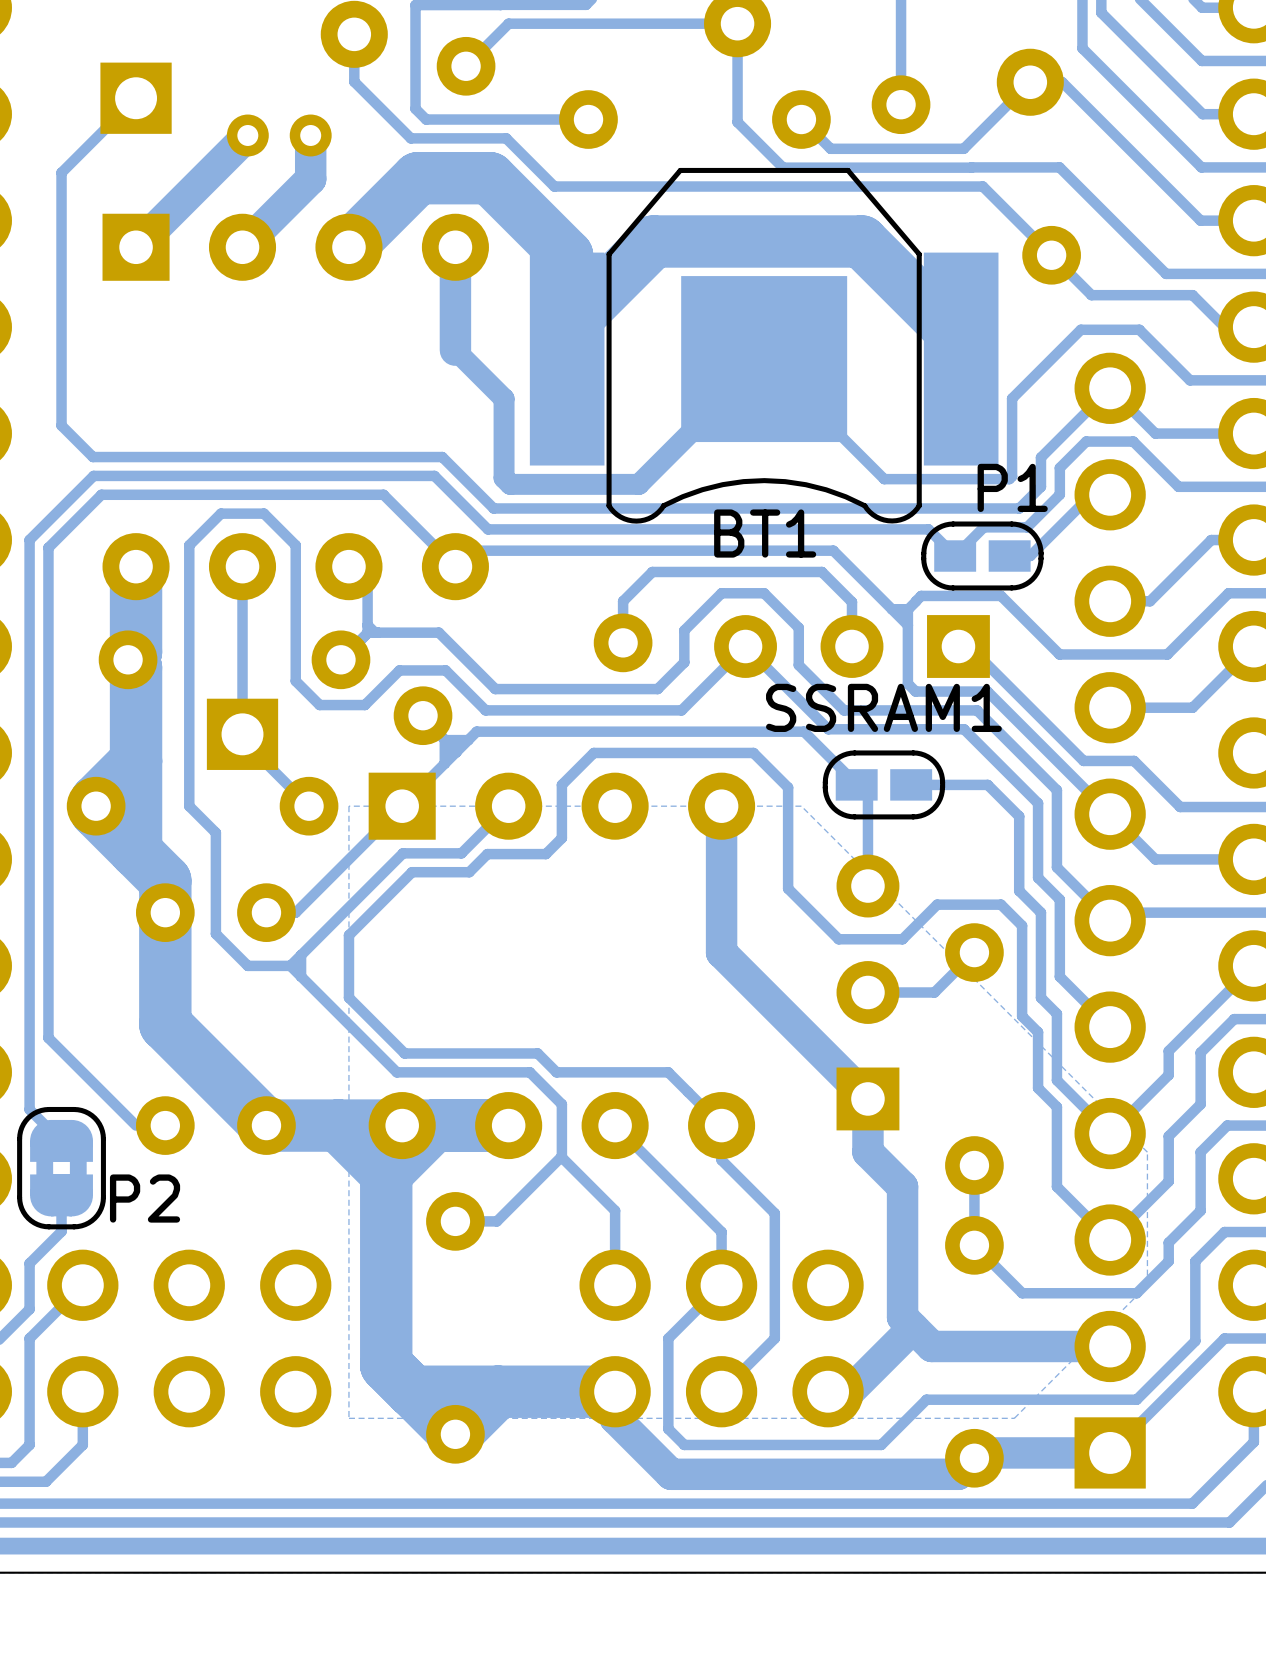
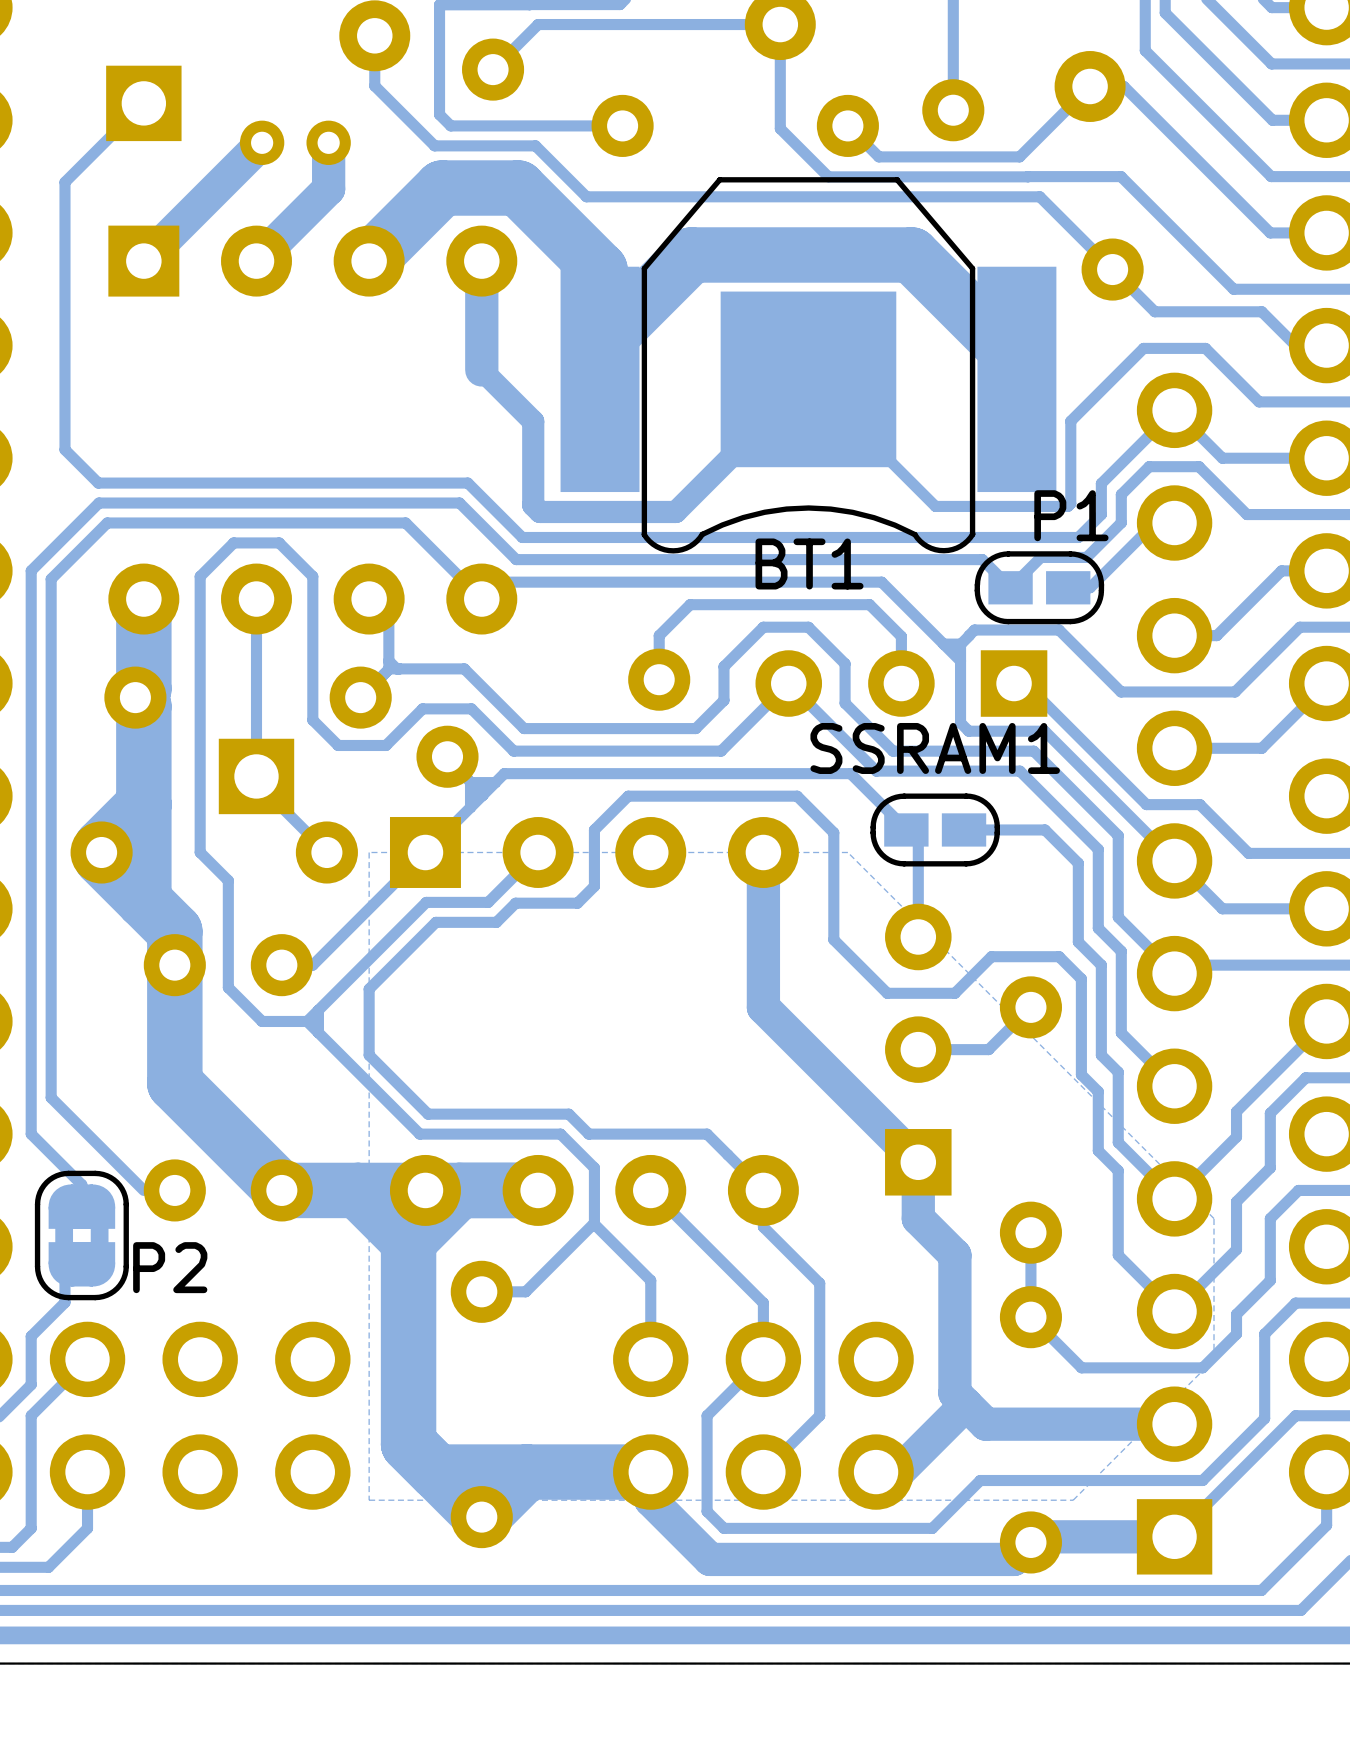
bottom track: (29, 1072) (29, 1109) (61, 1141) -> (31, 1134) (81, 1184) (81, 1207)
P2 position: (61, 1168) -> (81, 1235)

